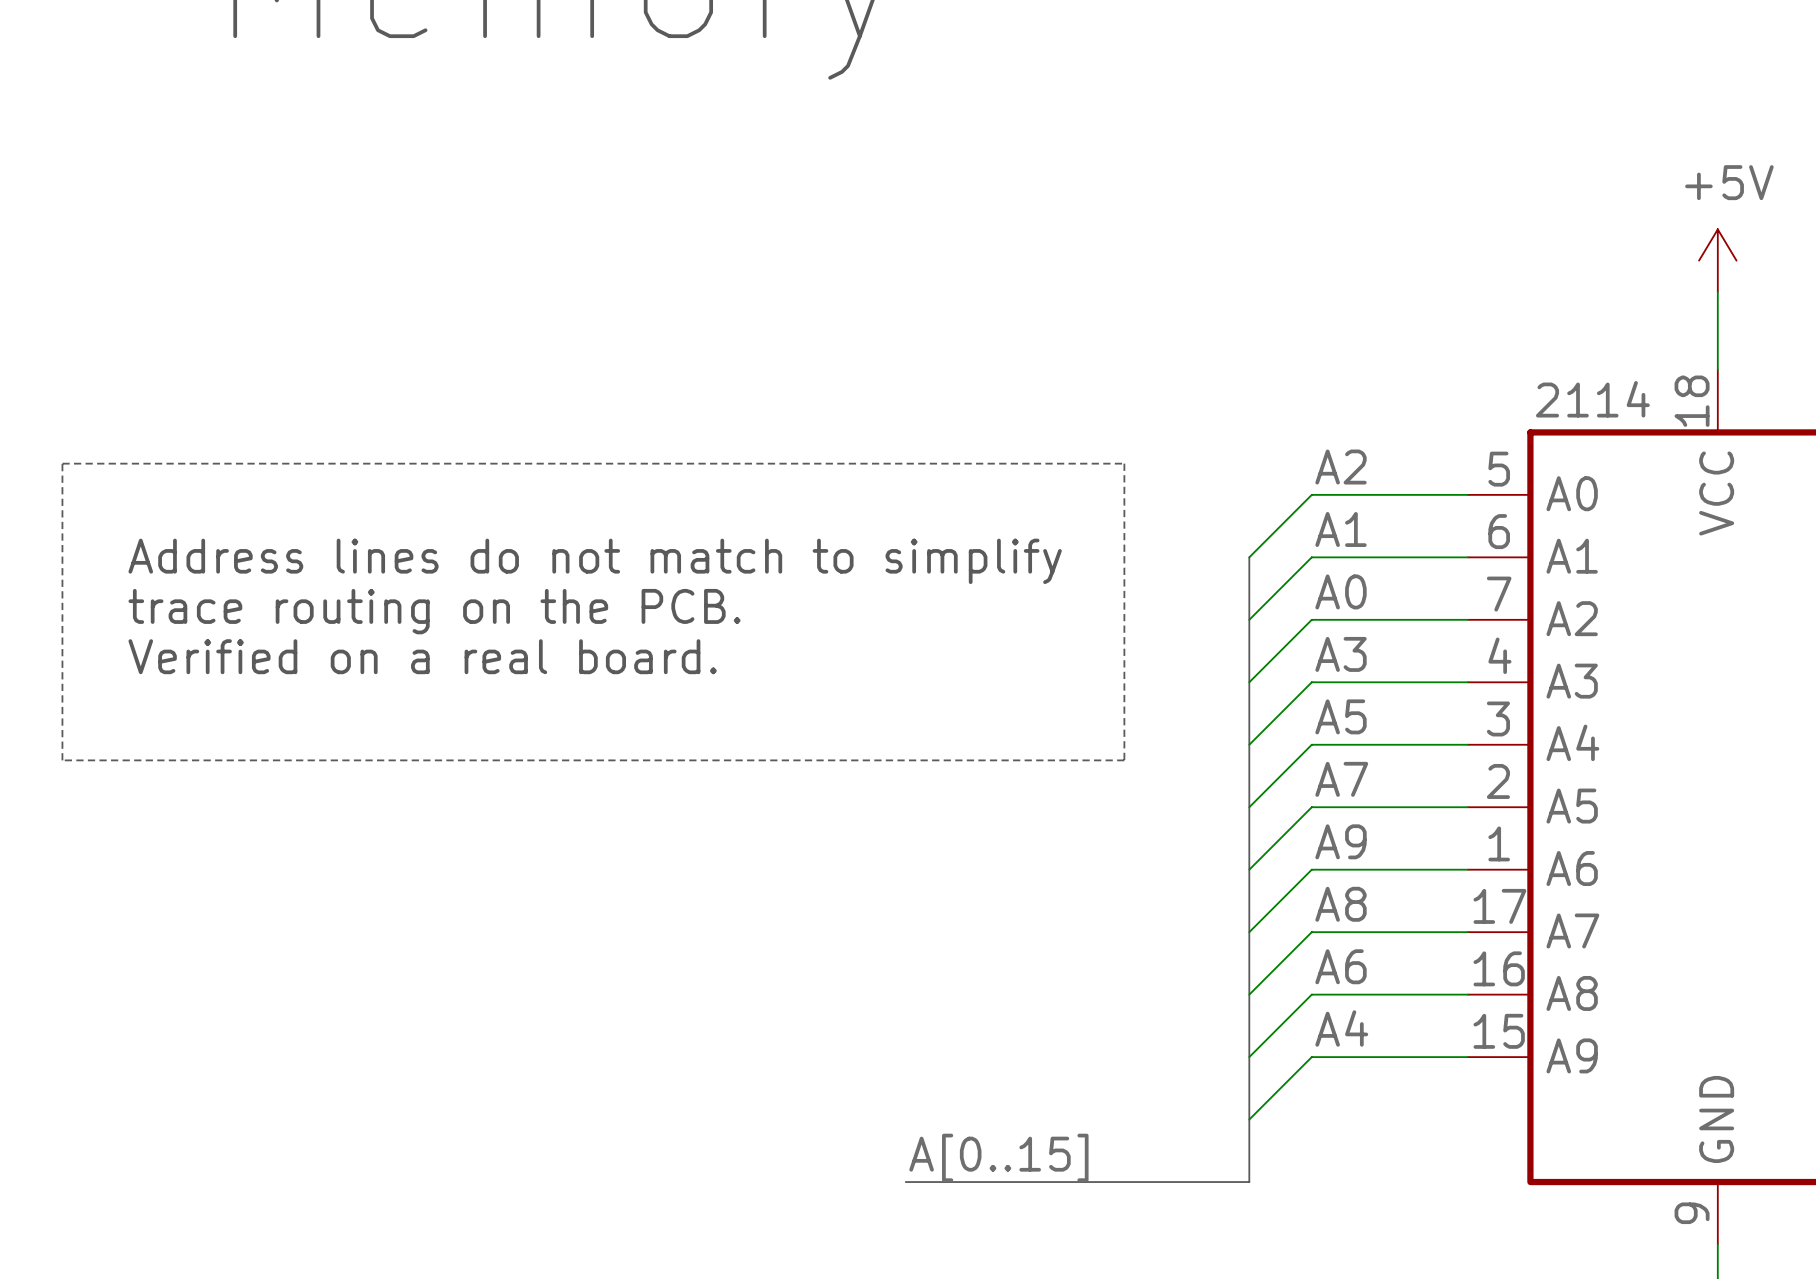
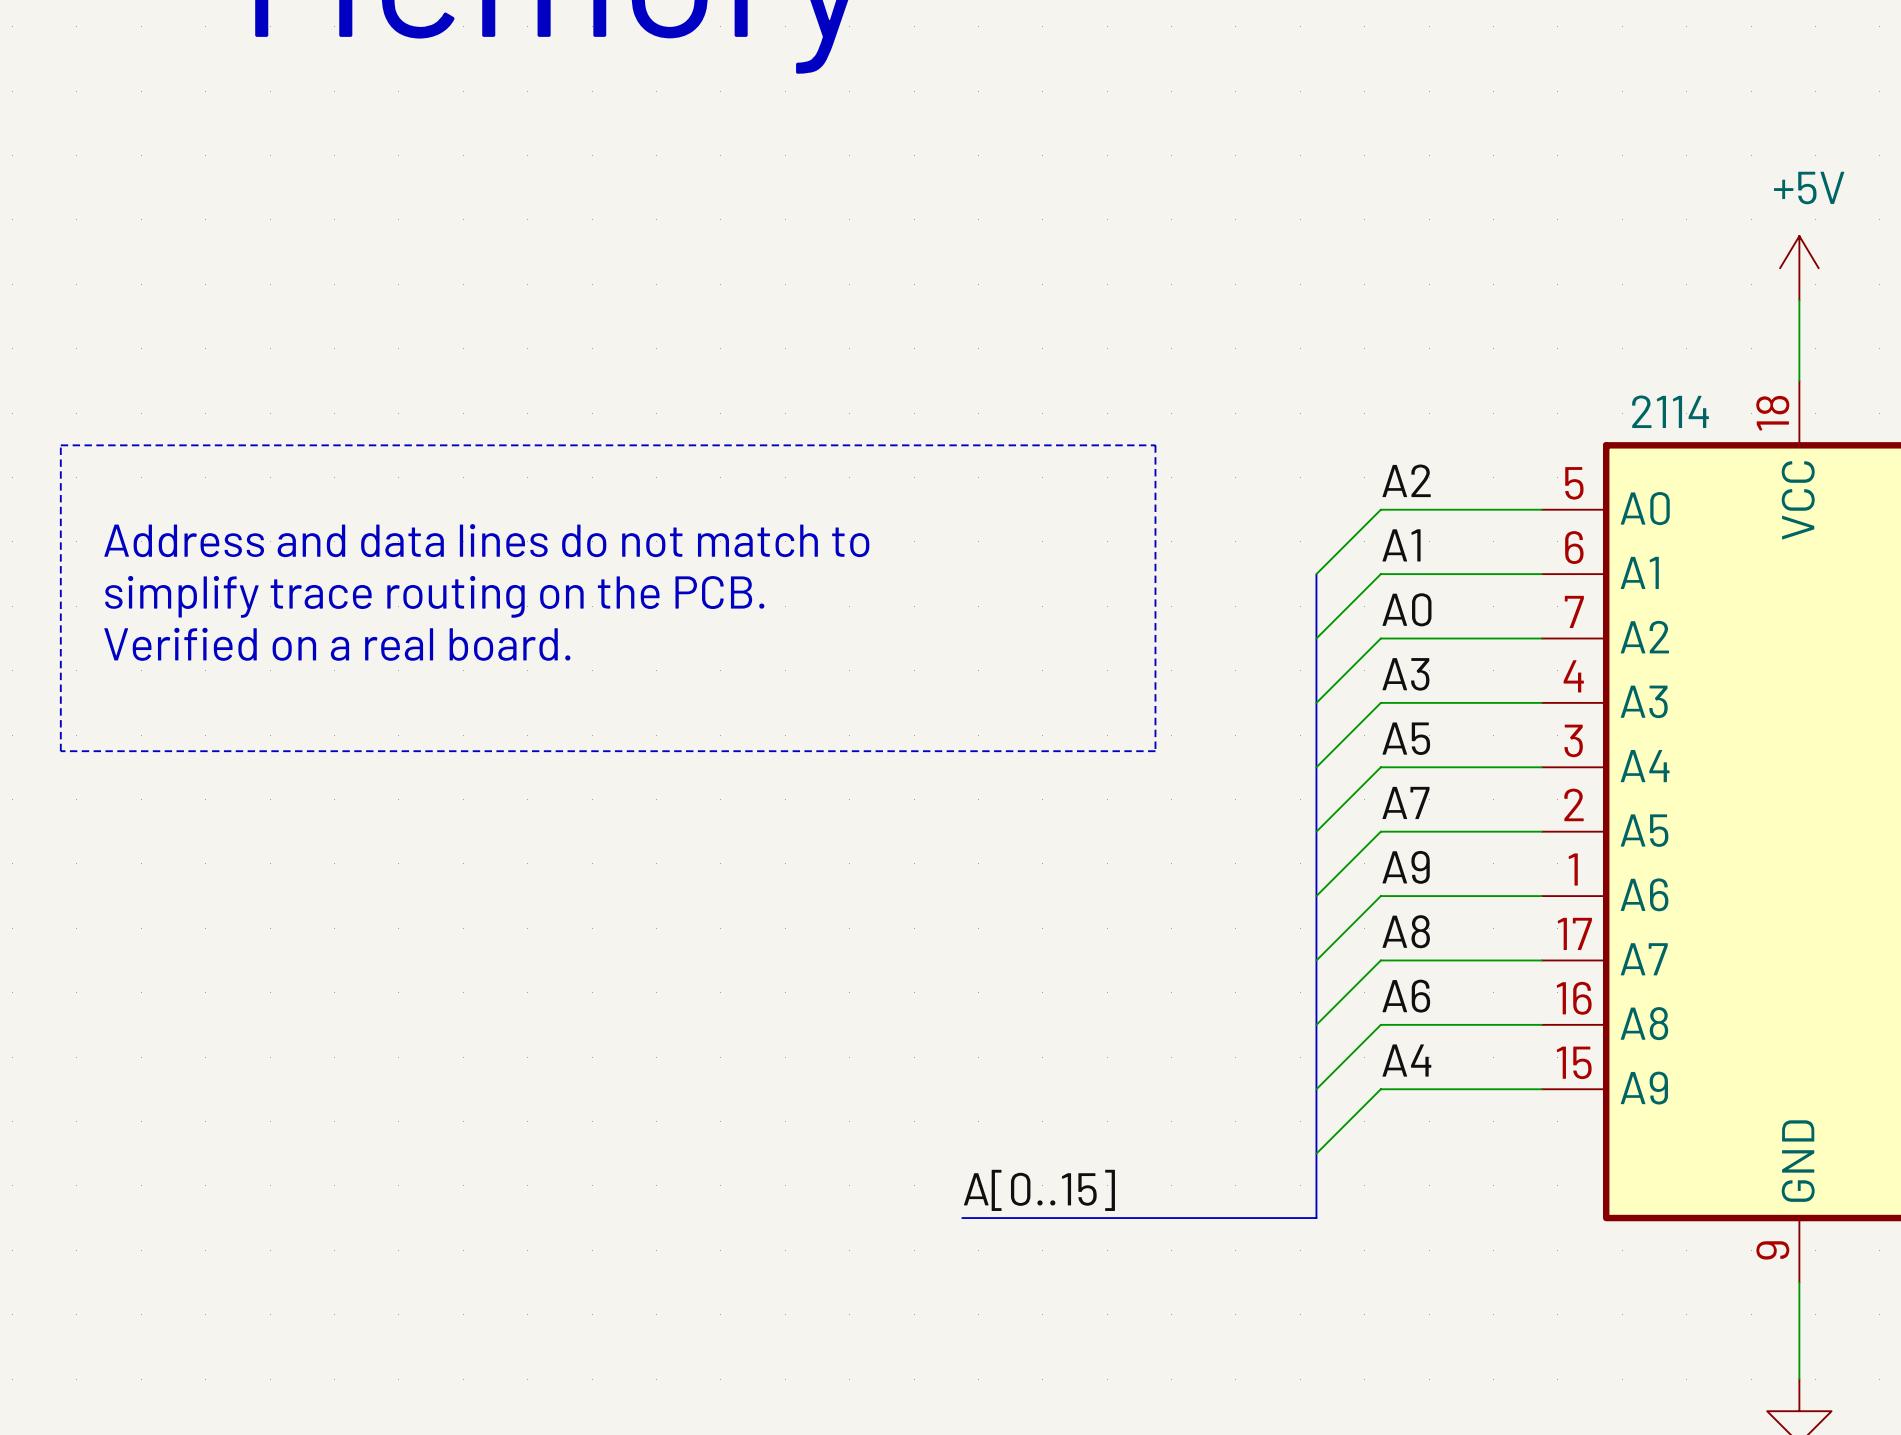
line: (62, 463) (1124, 463) (1124, 760) (62, 760) (62, 463) -> (60, 445) (1155, 445) (1155, 751) (60, 751) (60, 445)
text: Address lines do not match to simplify (595, 561) -> Address and data lines do not match to (486, 540)
text: trace routing on the PCB. (434, 611) -> simplify trace routing on the PCB. (434, 596)
text position: Verified on a real board. (422, 656) -> Verified on a real board. (337, 644)

